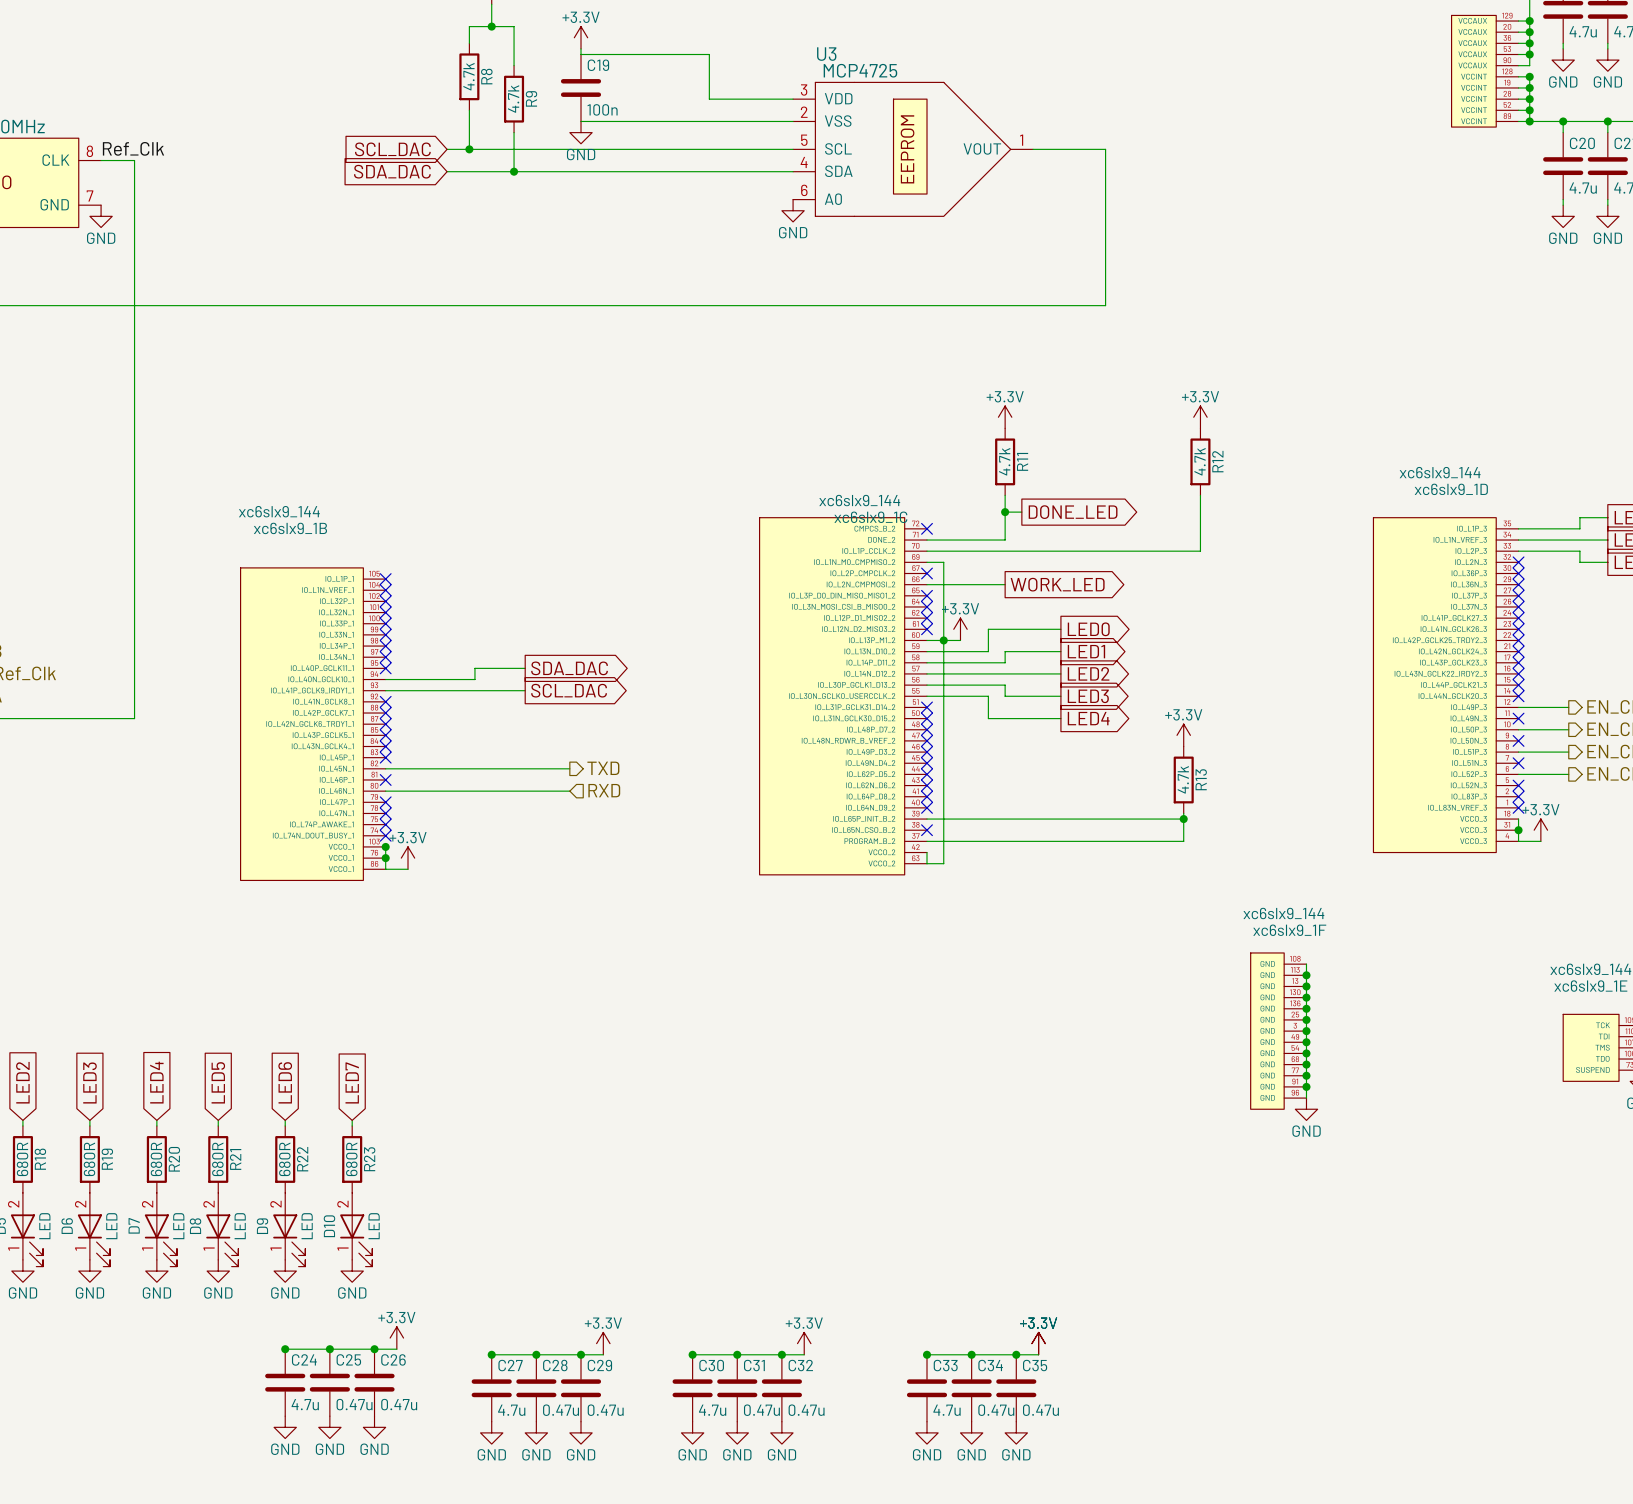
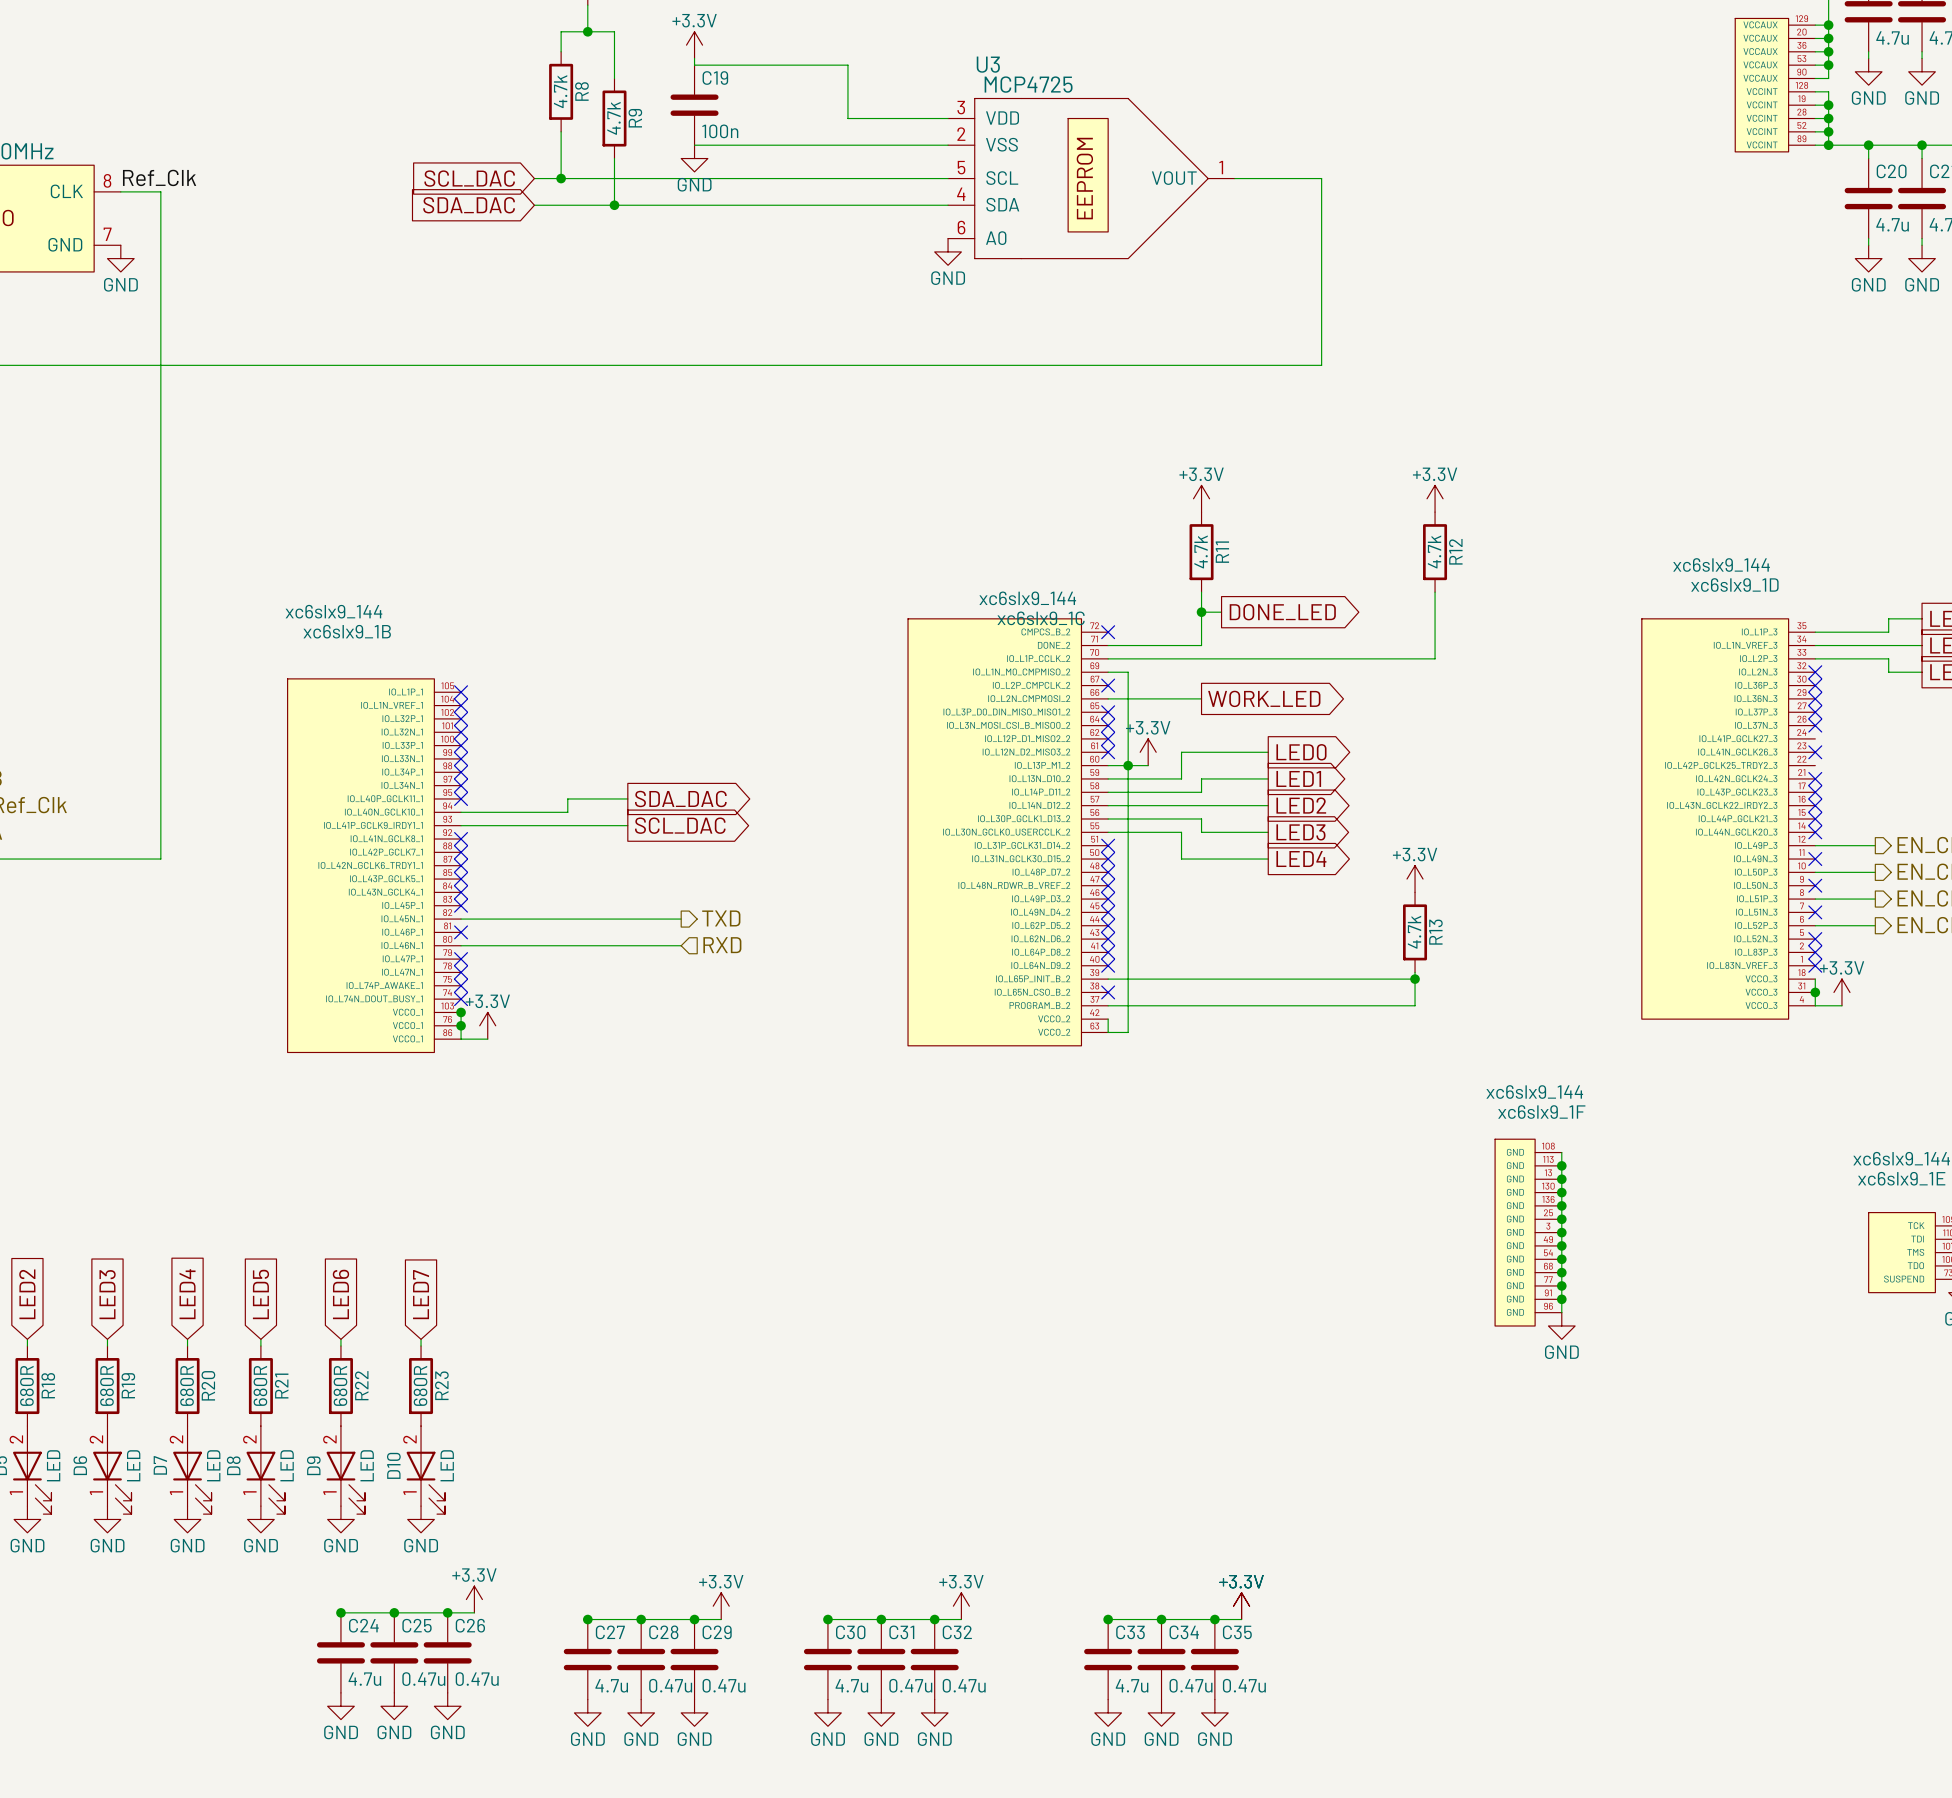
junction: (1529, 76) -> none
no-connect mark: (1518, 618) -> none
no-connect mark: (1518, 640) -> none

